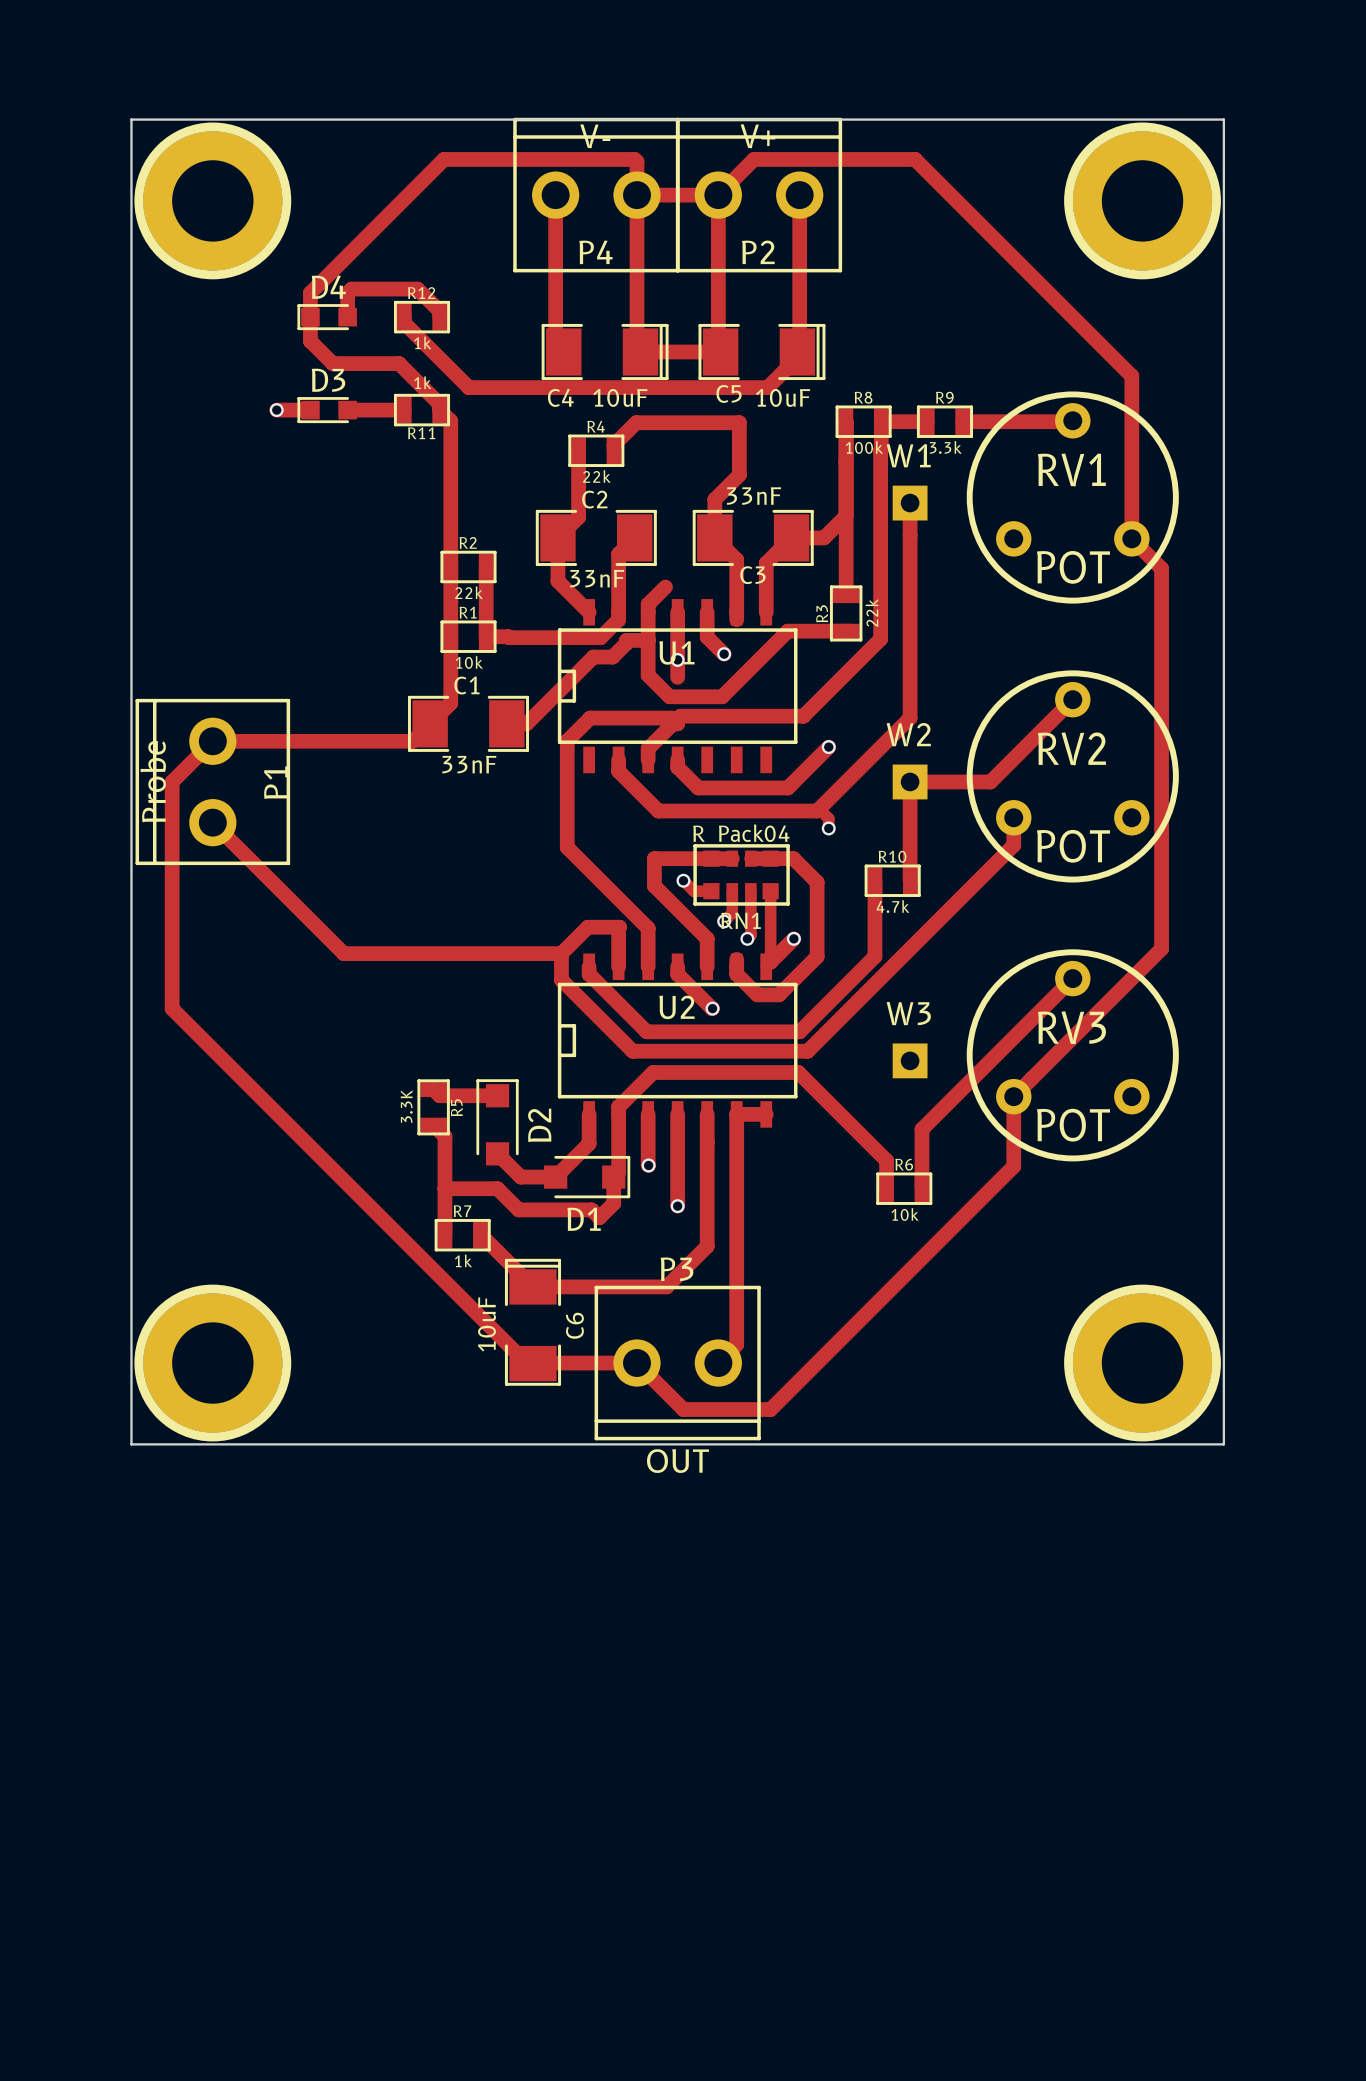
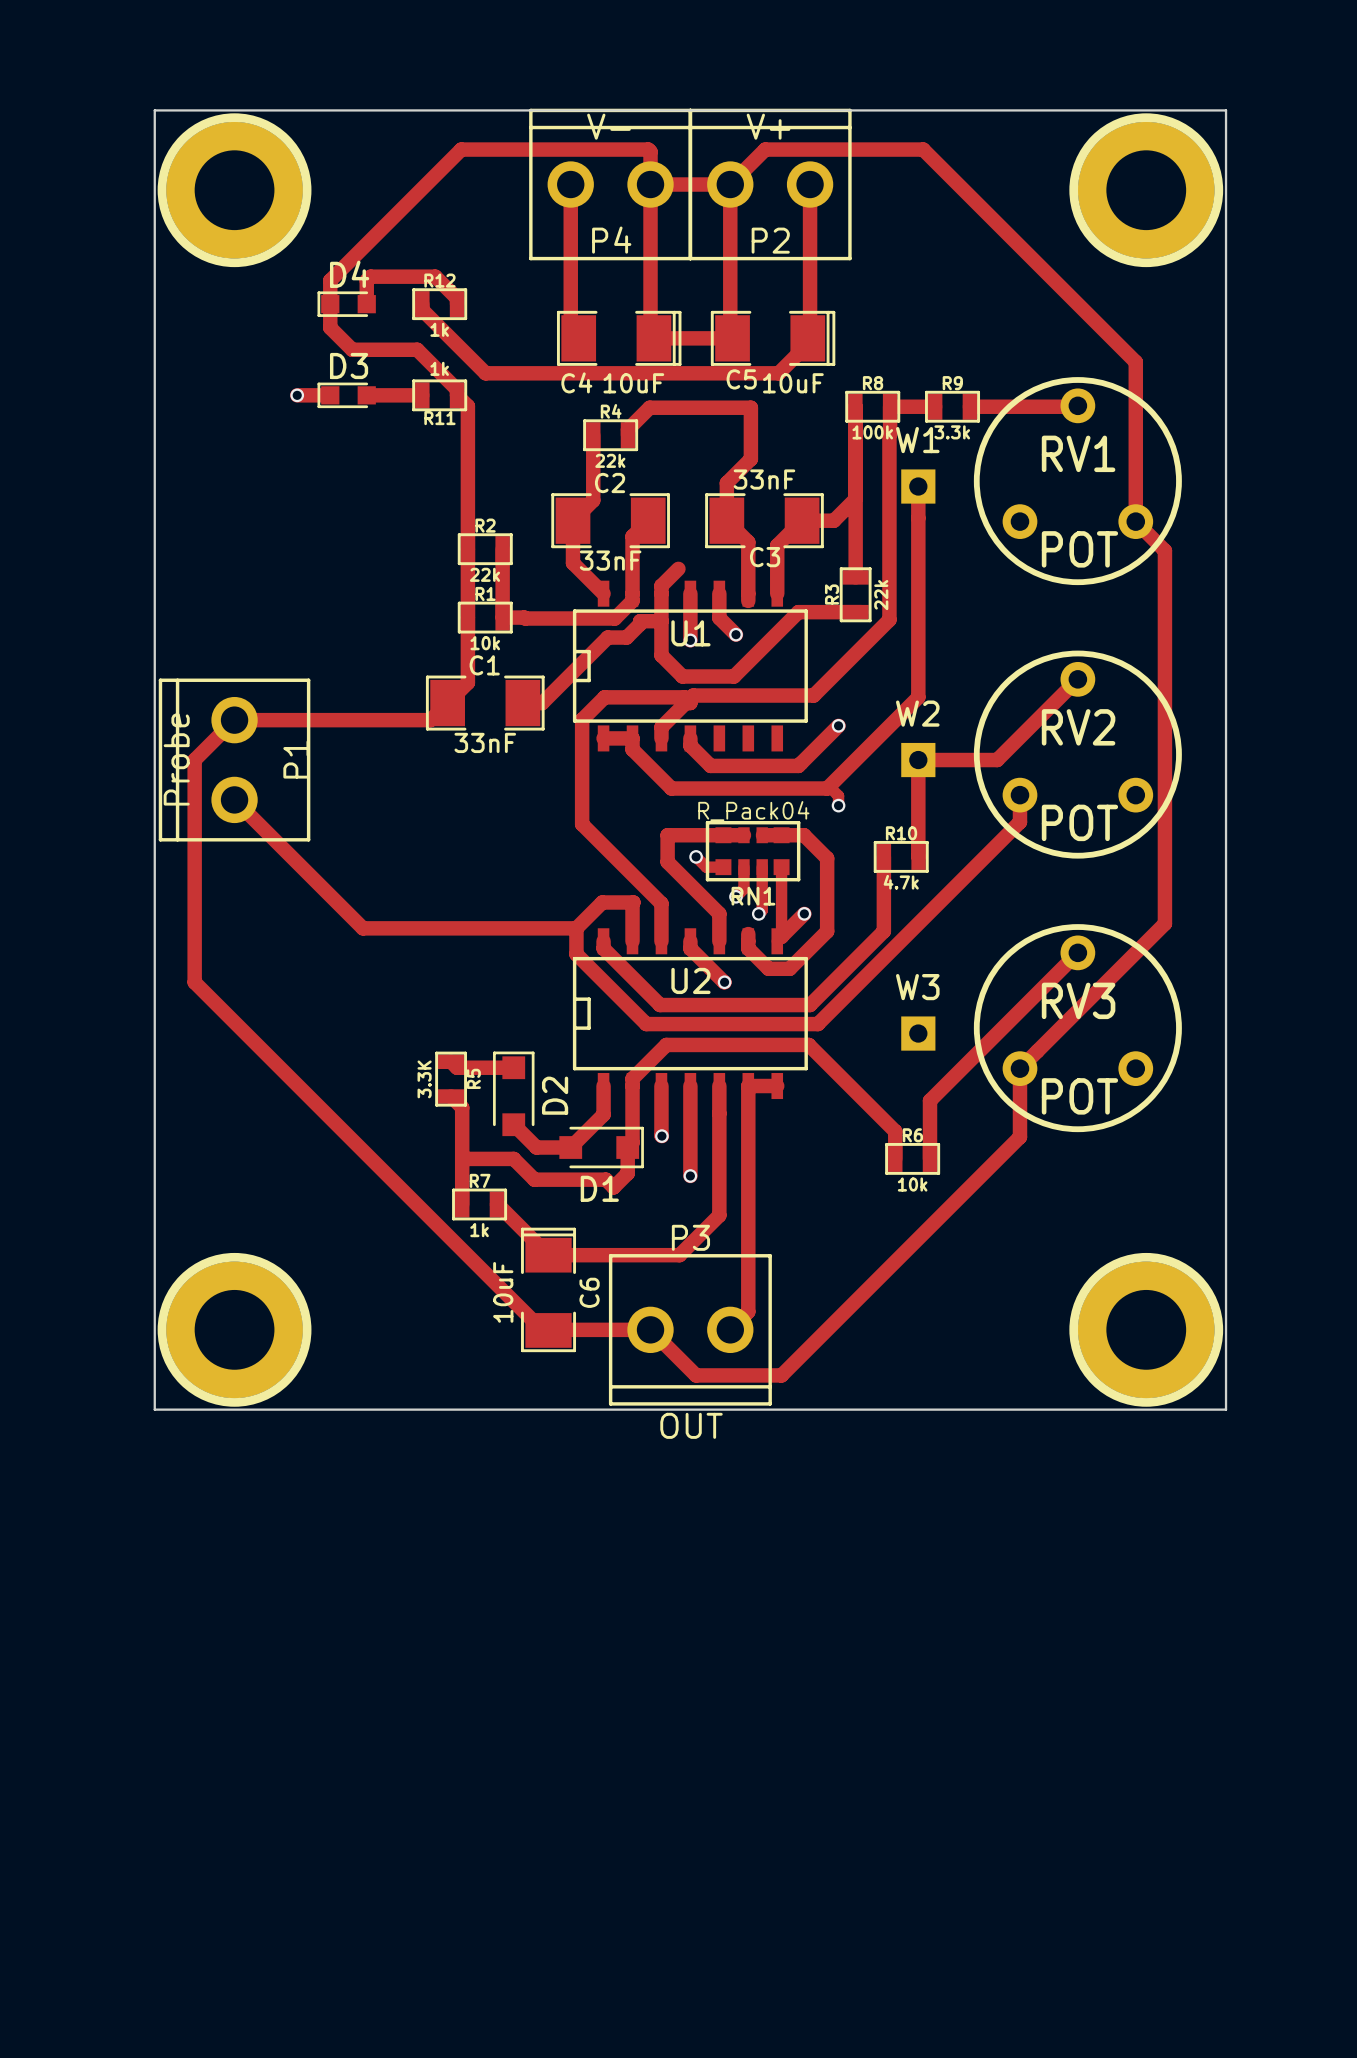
track: (677, 659) (677, 677) -> none
track: none -> (603, 738) (632, 738)

